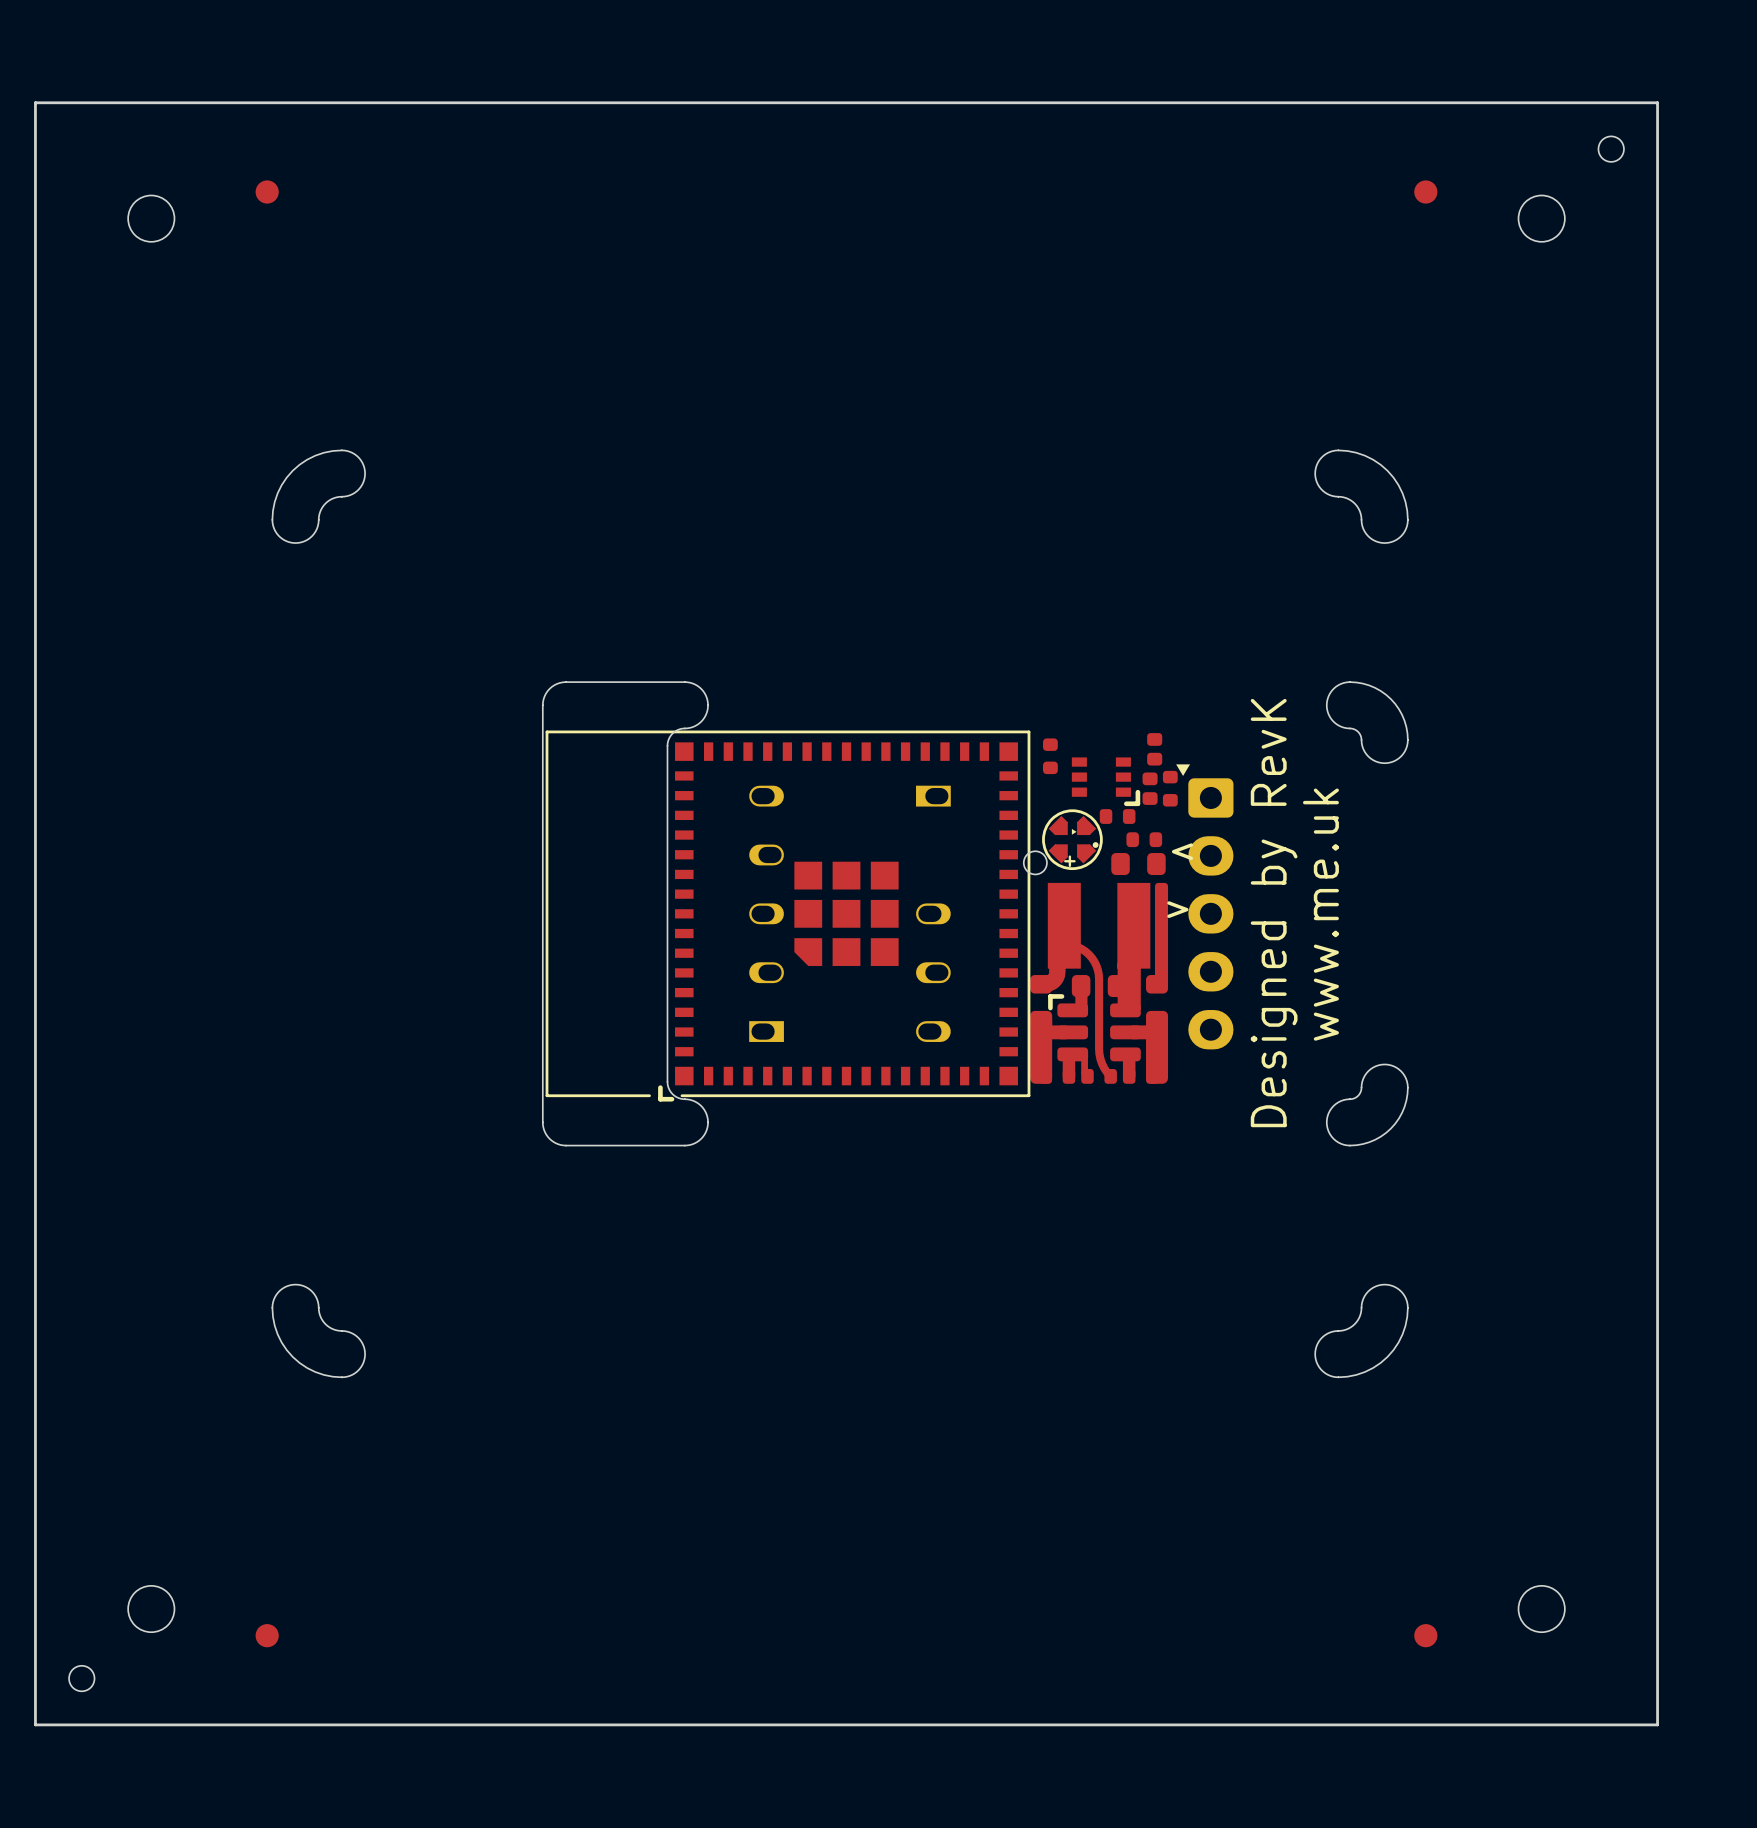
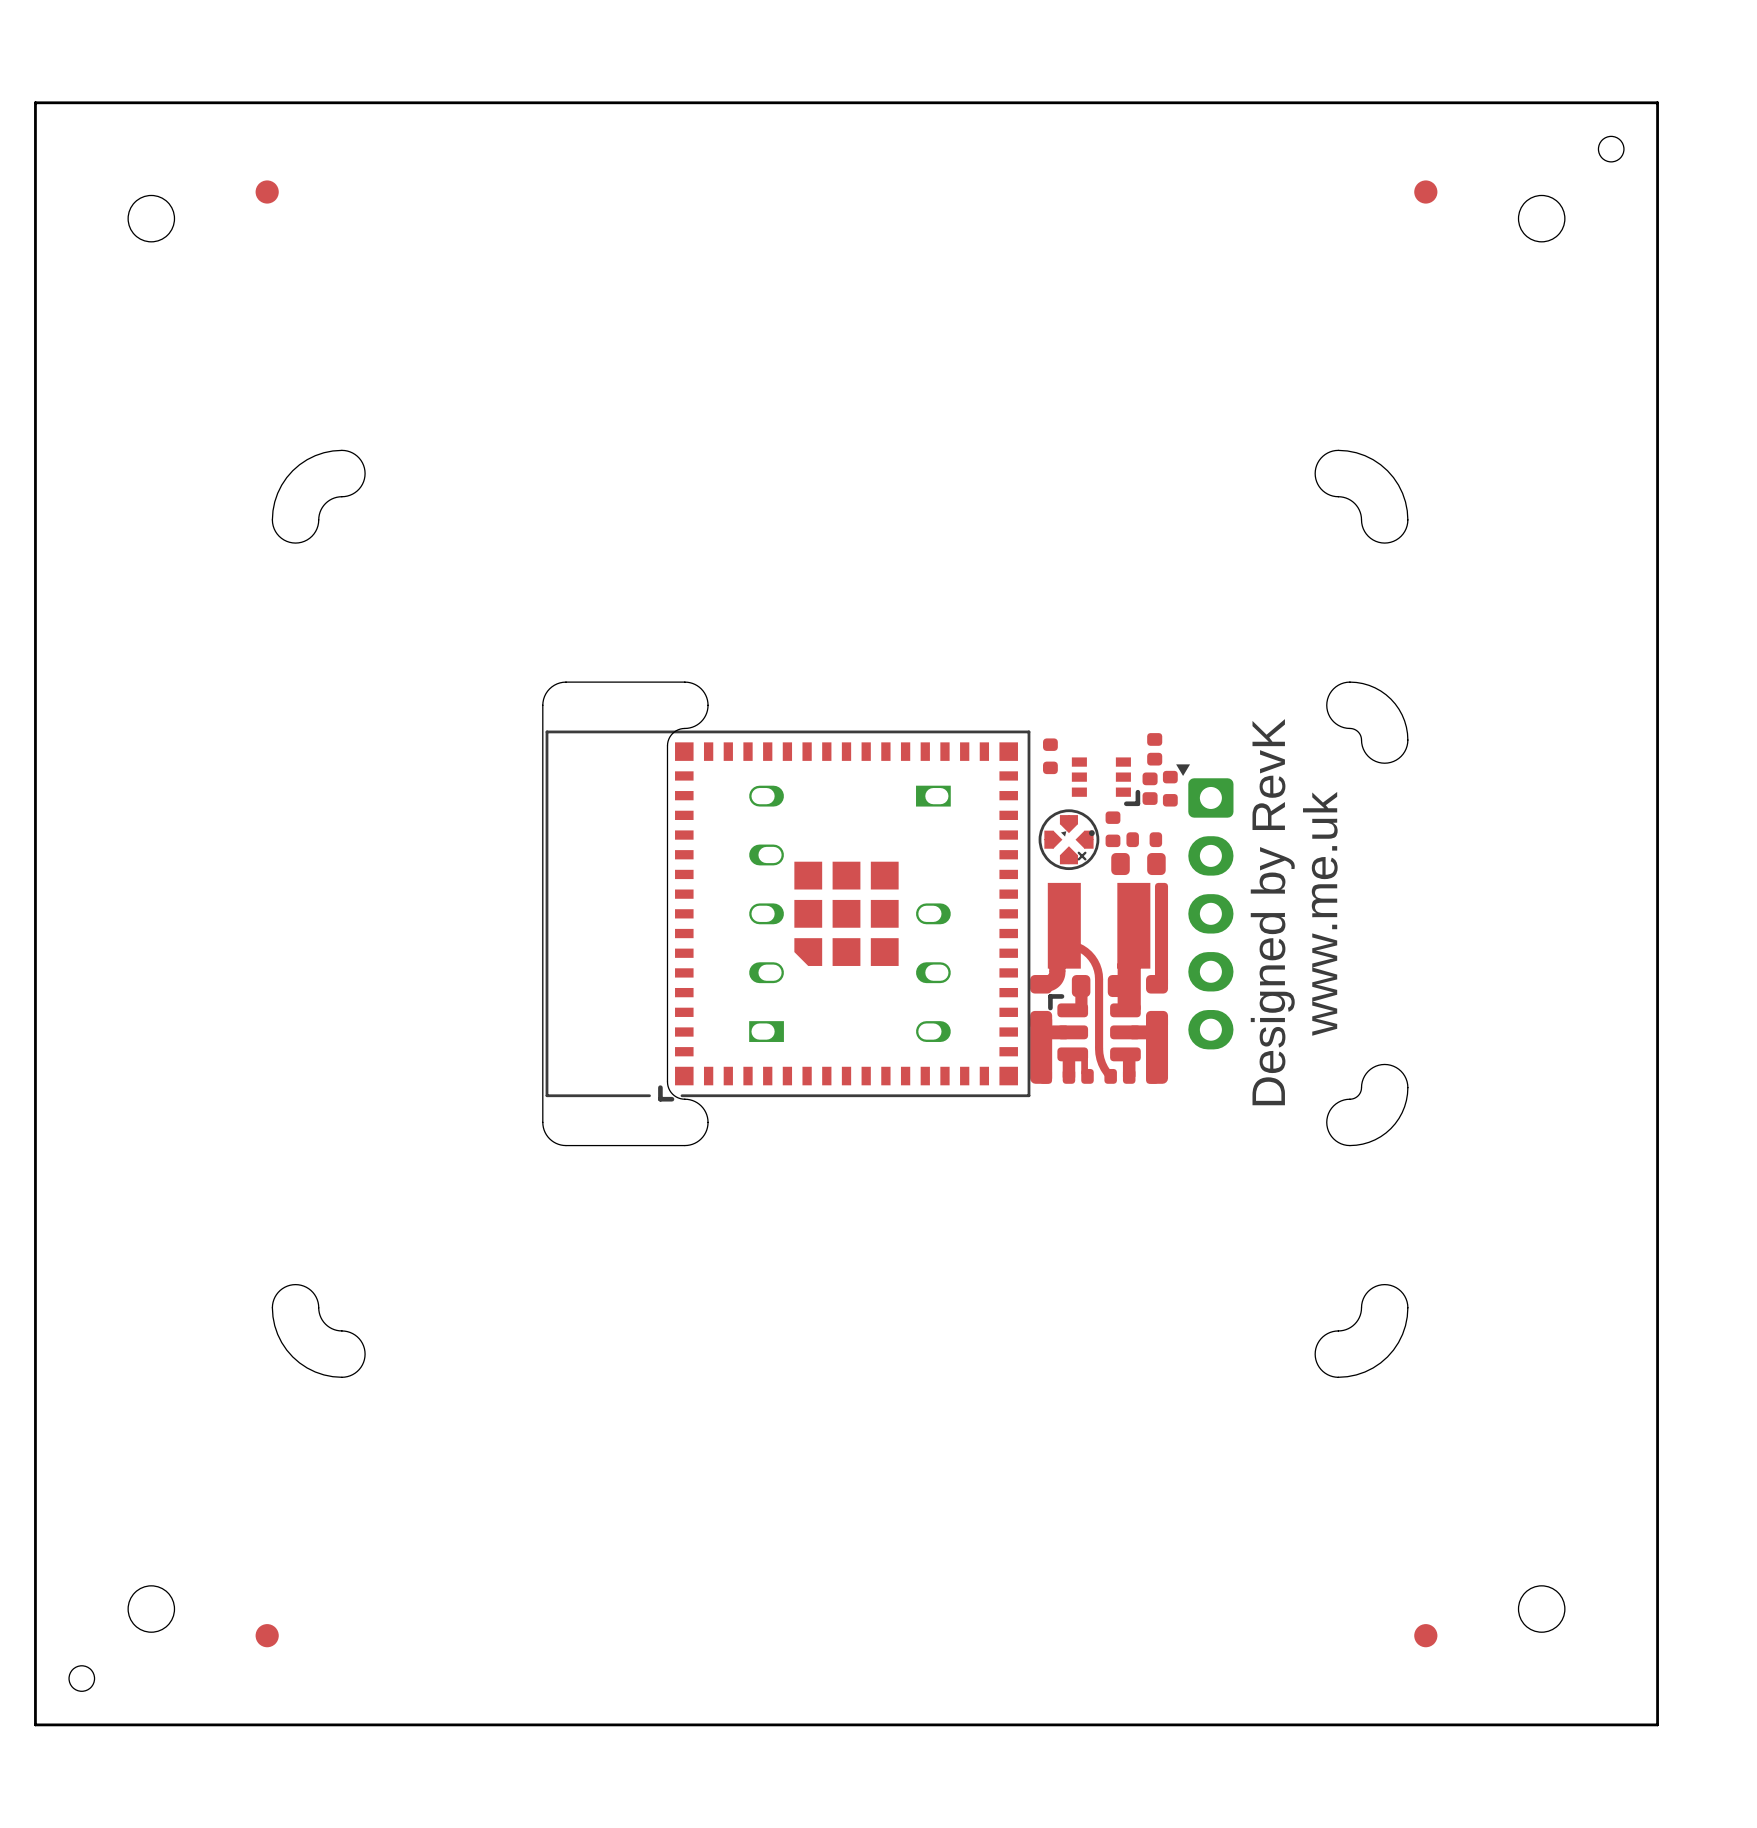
part footprint: [1042, 809, 1103, 871] -> [1038, 809, 1100, 871]
part rotation: 0° (1117, 816) -> 90° clockwise (1112, 829)
round board edge: [1023, 850, 1048, 876] -> none
text: > (1182, 851) -> none
text: < (1177, 909) -> none

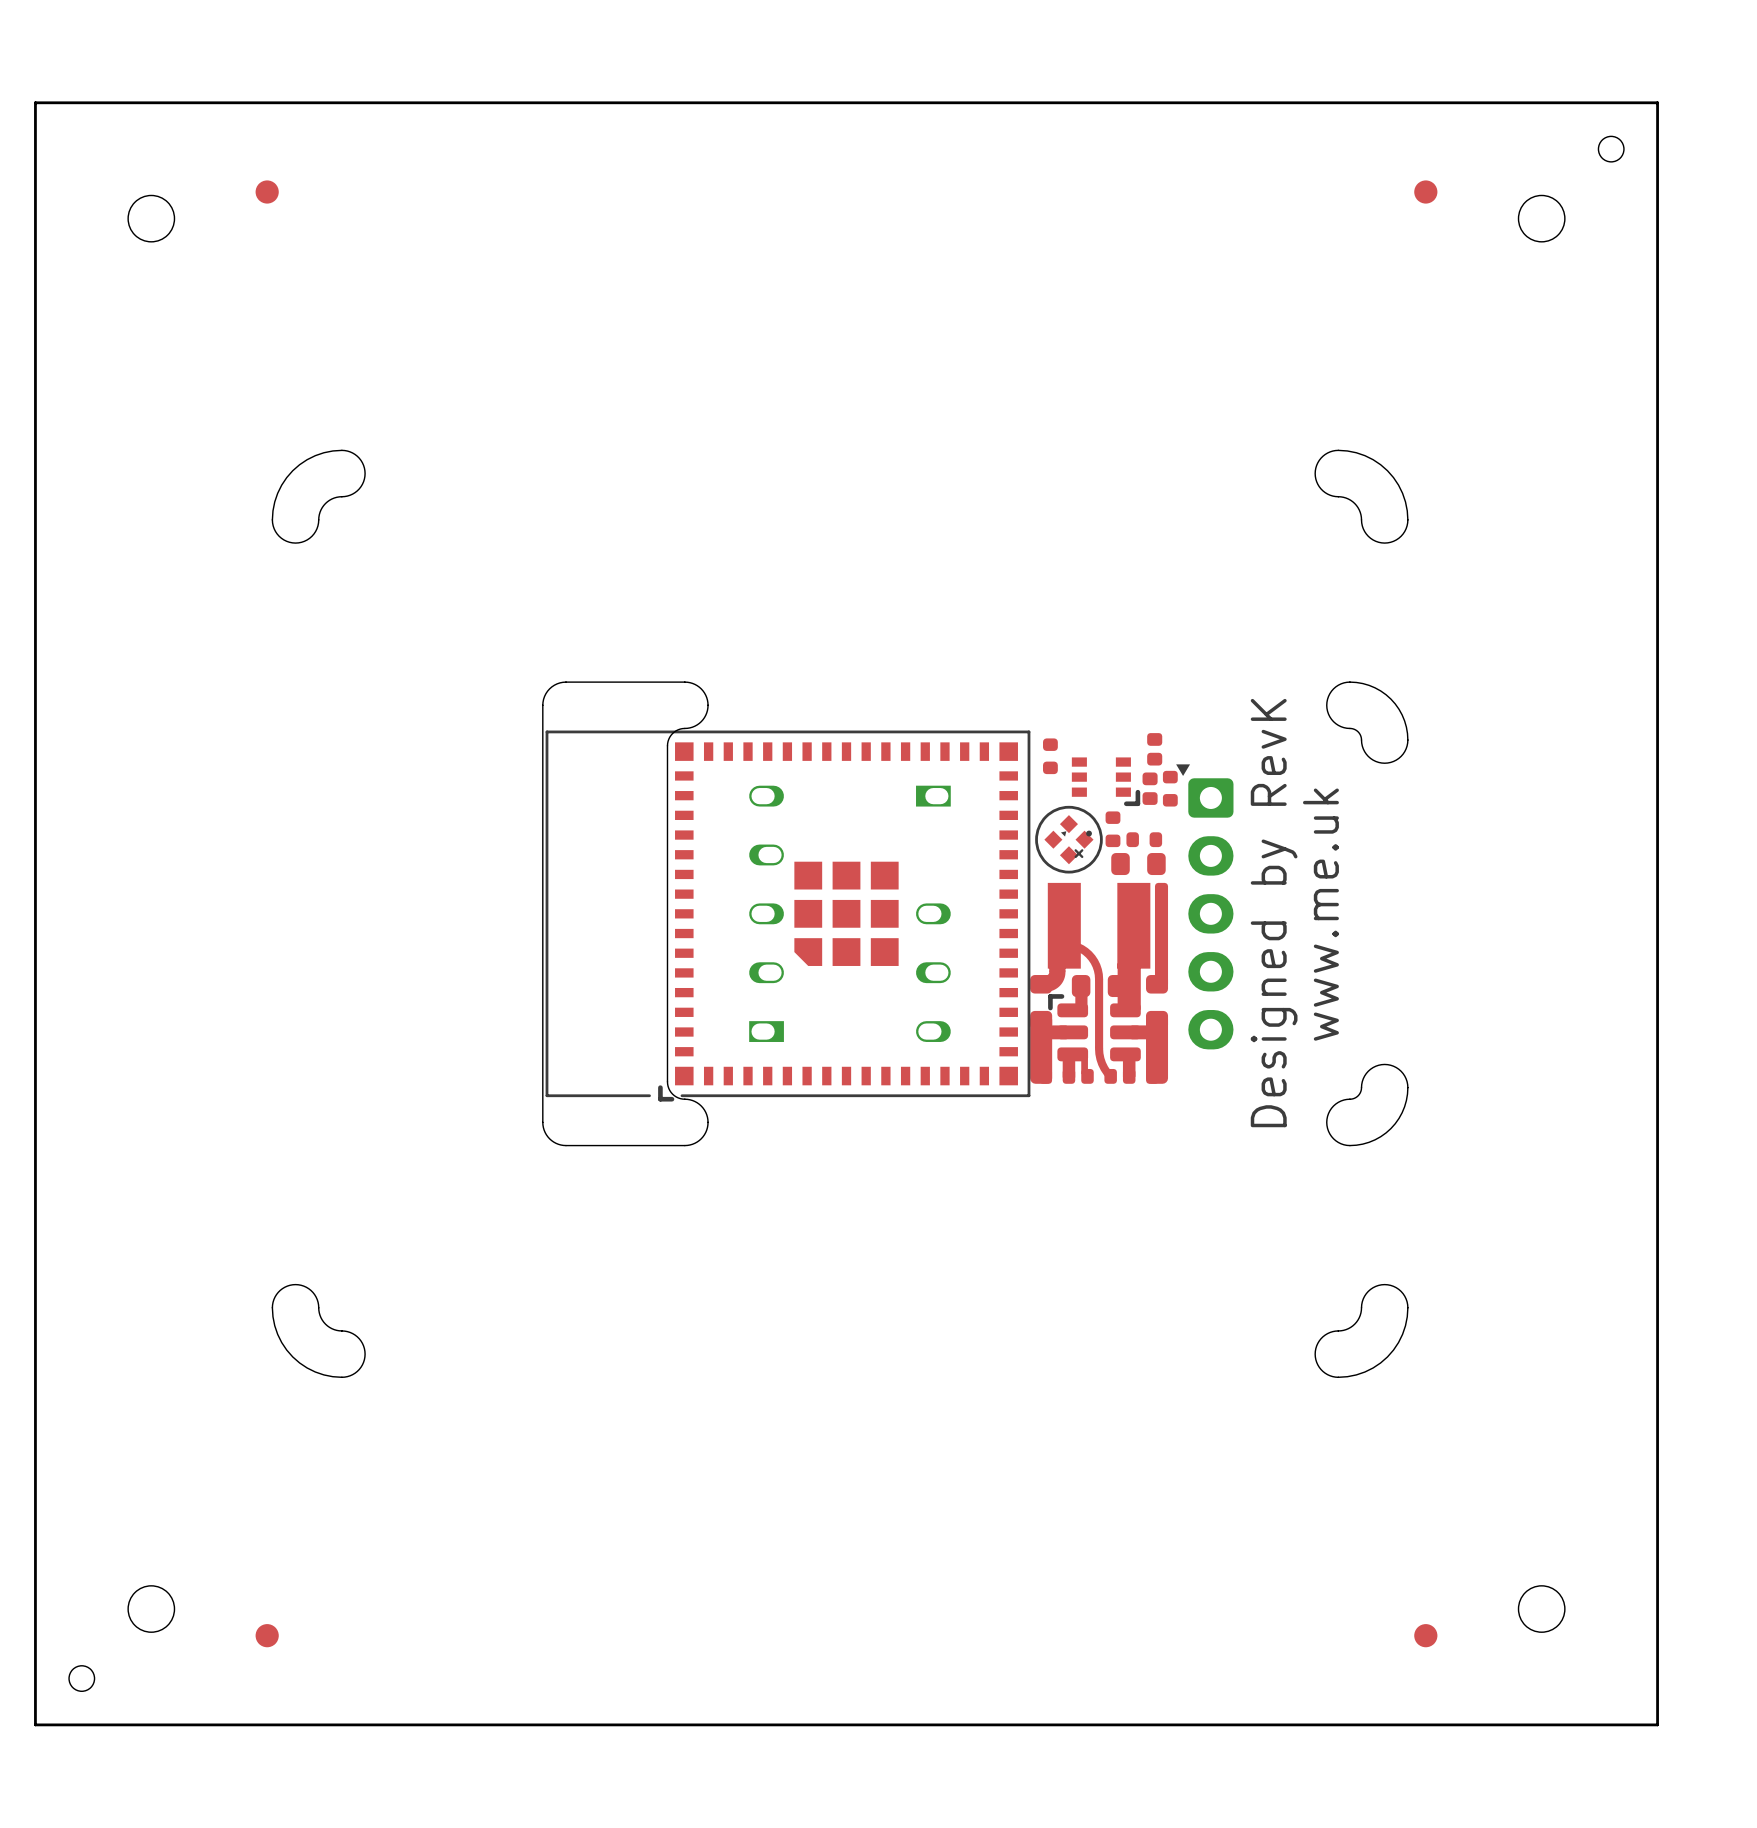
drawing: none -> [1035, 805, 1103, 874]
part footprint: [1038, 809, 1100, 871] -> [1044, 815, 1094, 865]

